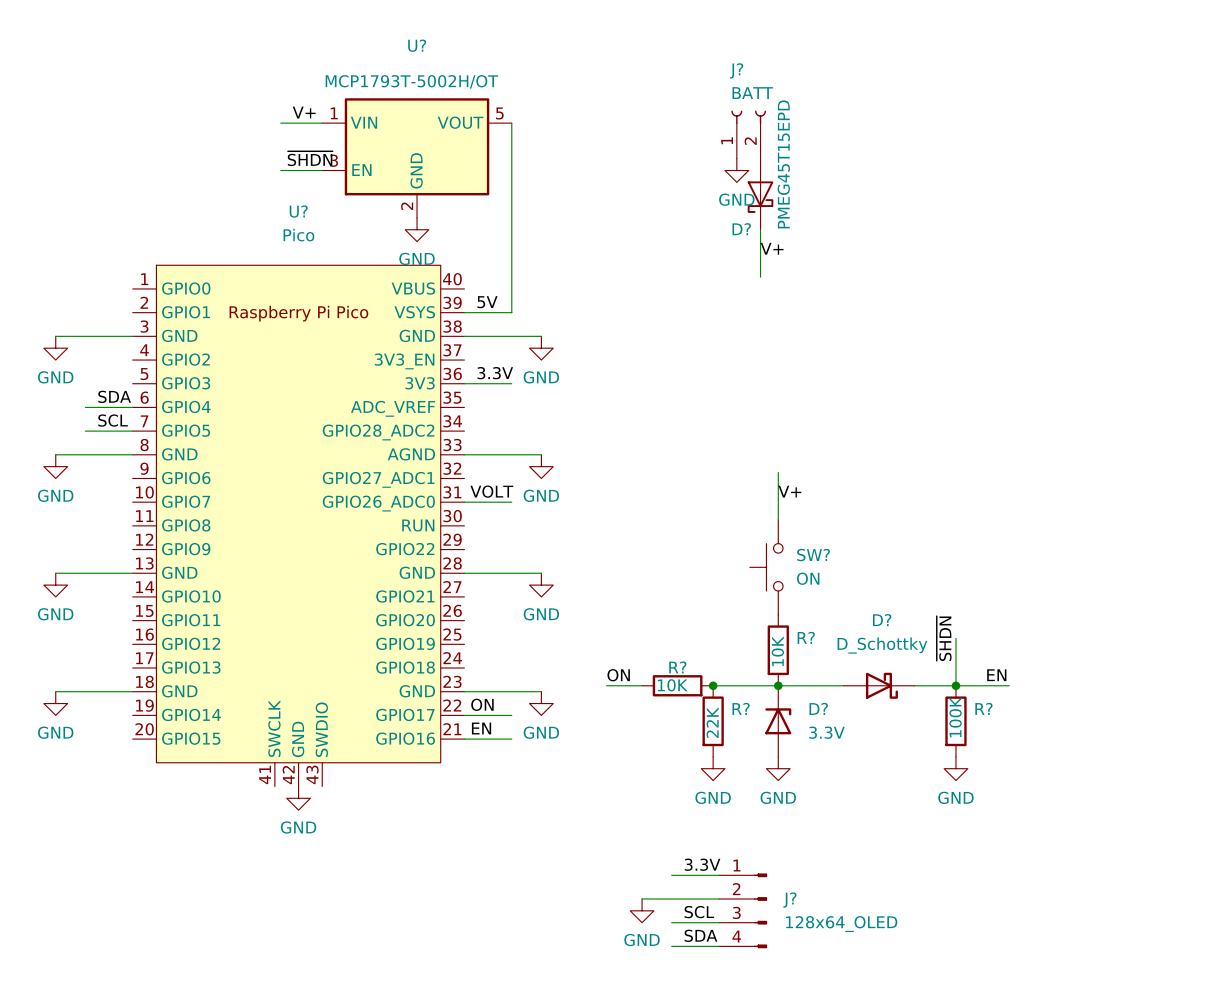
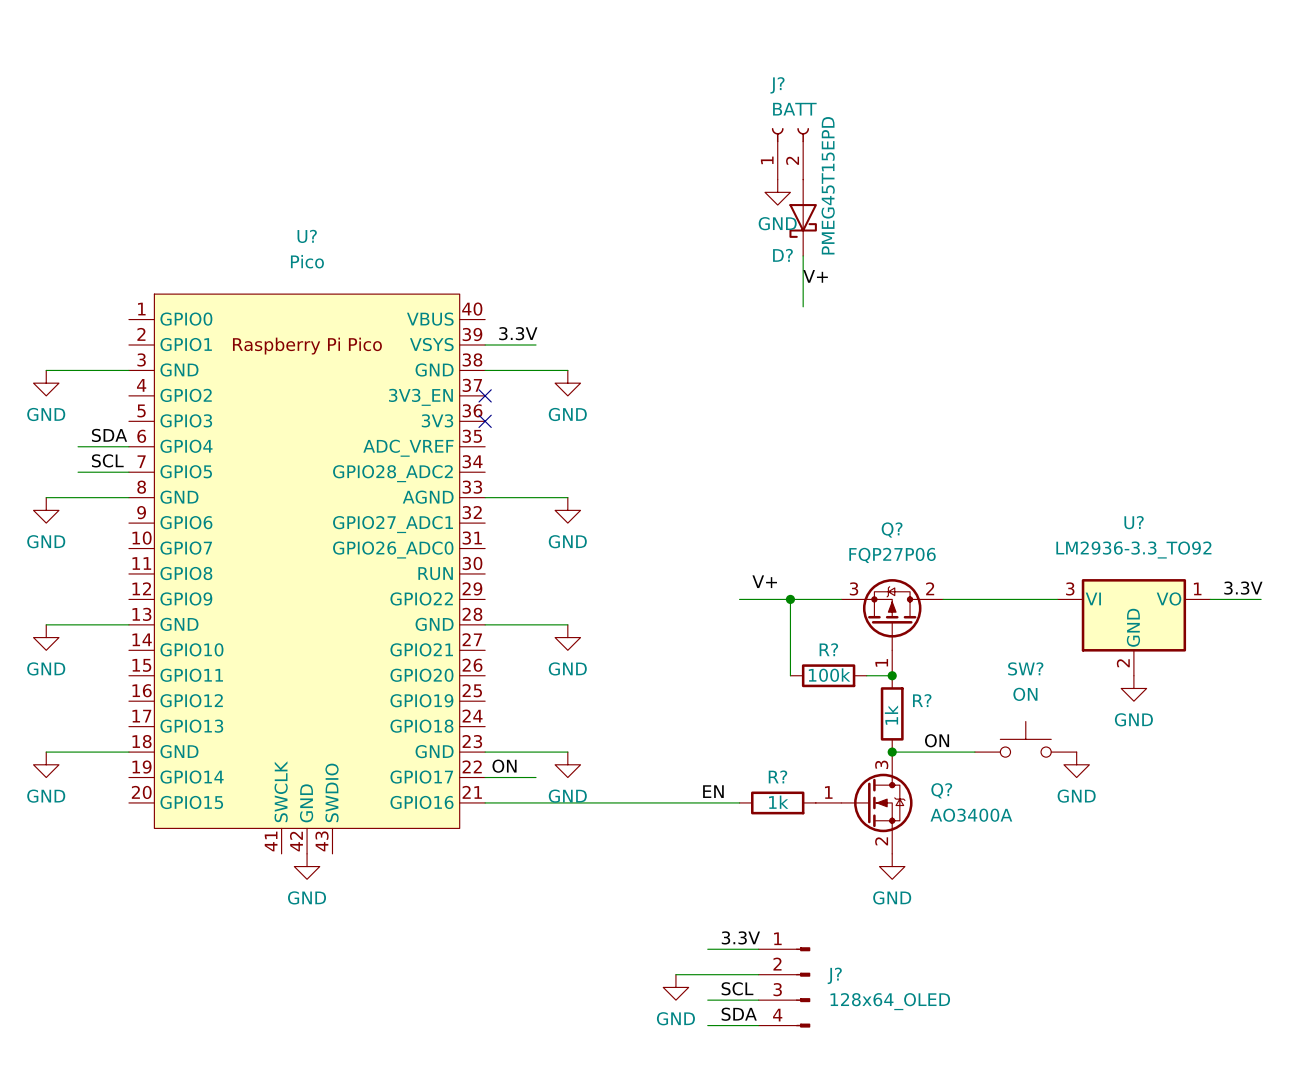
label: V+ (304, 112) -> none
wire: (280, 123) (322, 123) -> none
wire: (511, 123) (511, 312) -> none
label: ~{SHDN} (310, 158) -> none
U?: MCP1793T-5002H/OT (417, 158) -> none
wire: (280, 170) (322, 170) -> none
power symbol: GND (417, 229) -> none
label: 5V (487, 302) -> 3.3V (518, 333)
no-connect mark: none -> (485, 395)
label: 3.3V (495, 373) -> none
wire: (464, 383) (511, 383) -> none
no-connect mark: none -> (485, 421)
wire: (778, 472) (778, 519) -> none
label: VOLT (491, 491) -> none
label position: V+ (789, 491) -> V+ (764, 581)
wire: (464, 502) (511, 502) -> none
label: none -> 3.3V (1243, 588)
wire: none -> (739, 599) (841, 599)
wire: none -> (790, 599) (790, 675)
junction: none -> (790, 599)
wire: none -> (943, 599) (1057, 599)
wire: none -> (1210, 599) (1261, 599)
SW? name position: SW? (813, 555) -> SW? (1025, 668)
SW? rotation: 0° (766, 567) -> 90° clockwise (1025, 739)
SW? position: (766, 567) -> (1025, 739)
Q?: none -> FQP27P06 (892, 627)
U?: none -> LM2936-3.3_TO92 (1133, 627)
SW? value position: ON (808, 578) -> ON (1025, 694)
R?: none -> 100k (828, 675)
wire: none -> (866, 675) (892, 675)
junction: none -> (892, 675)
power symbol: none -> GND (1133, 688)
label: ~{SHDN} (944, 638) -> none
wire: (955, 638) (955, 685) -> none
R?: 10K (778, 650) -> none
R?: none -> 1k (892, 713)
label: ON (618, 675) -> none
label: EN (996, 675) -> none
label: none -> ON (937, 740)
wire: (606, 685) (642, 685) -> none
R?: 10K (677, 685) -> none
wire: (713, 685) (843, 685) -> none
junction: (713, 685) -> none
junction: (778, 685) -> none
D?: D_Schottky (878, 685) -> none
wire: (914, 685) (1009, 685) -> none
junction: (955, 685) -> none
wire: none -> (892, 752) (974, 752)
junction: none -> (892, 752)
power symbol: none -> GND (1076, 764)
R?: 22K (713, 721) -> none
D?: 3.3V (778, 721) -> none
R?: 100K (955, 721) -> none
label: EN (481, 728) -> none
label: none -> EN (713, 791)
wire: none -> (536, 802) (739, 802)
R?: none -> 1k (777, 802)
Q?: none -> AO3400A (864, 802)
power symbol: GND (713, 768) -> none
power symbol: GND (778, 768) -> none
power symbol: GND (955, 768) -> none
power symbol: none -> GND (892, 866)

